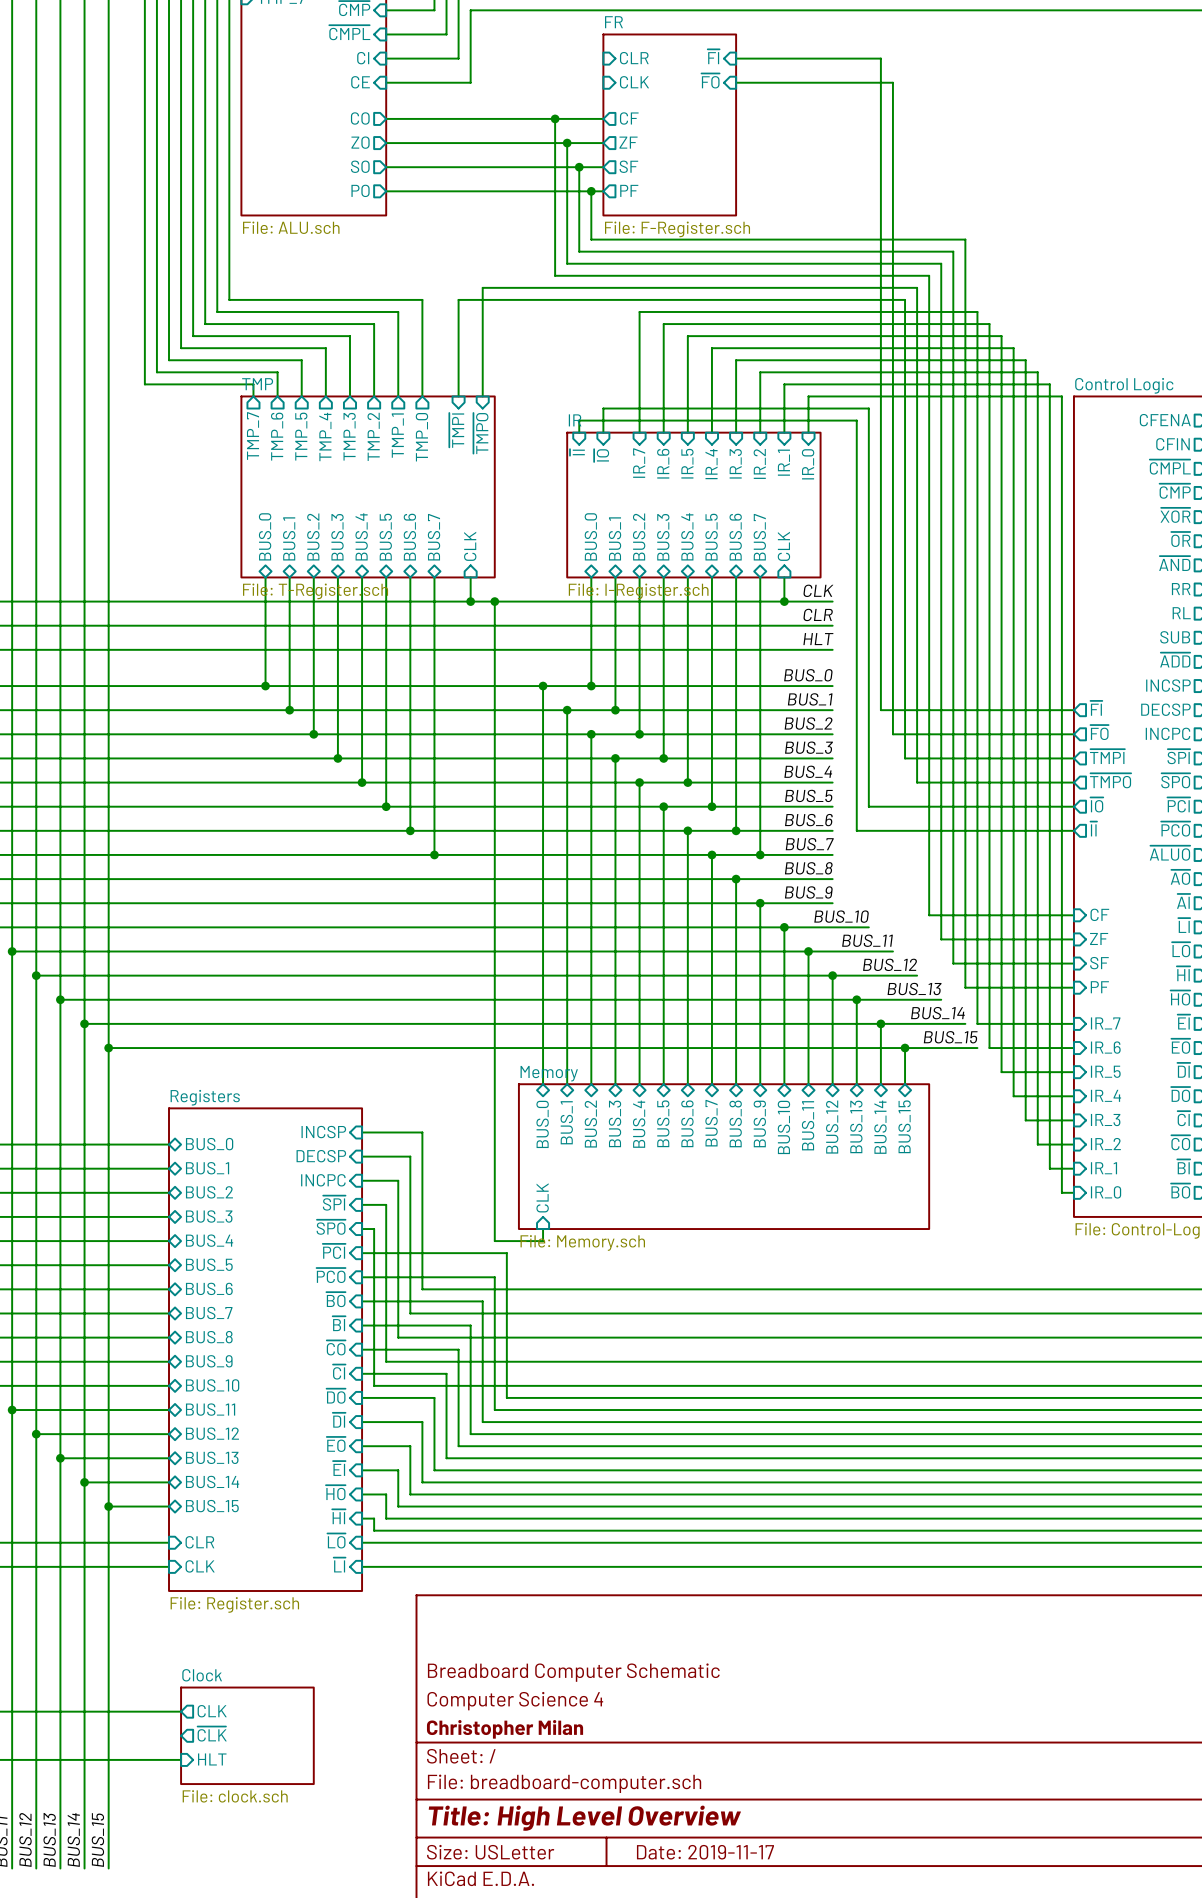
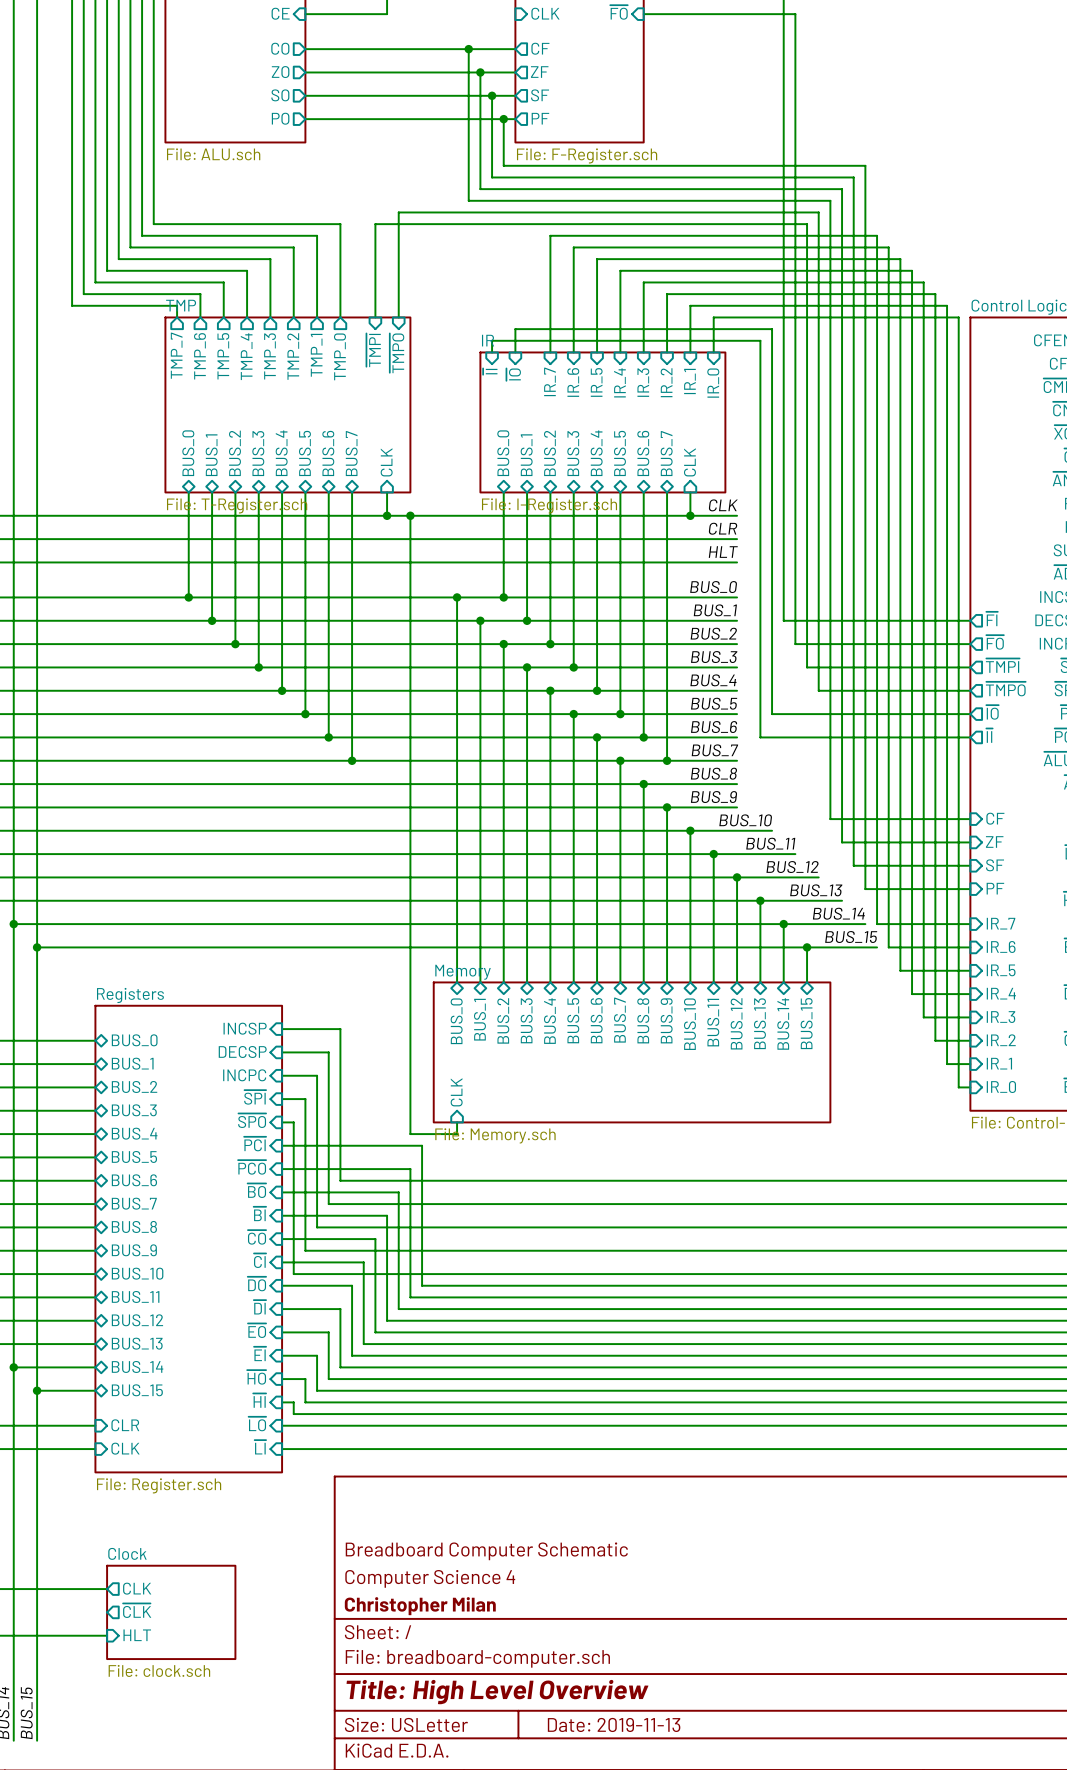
title block: Date: 2019-11-17 (705, 1852) -> Date: 2019-11-13 (614, 1724)

